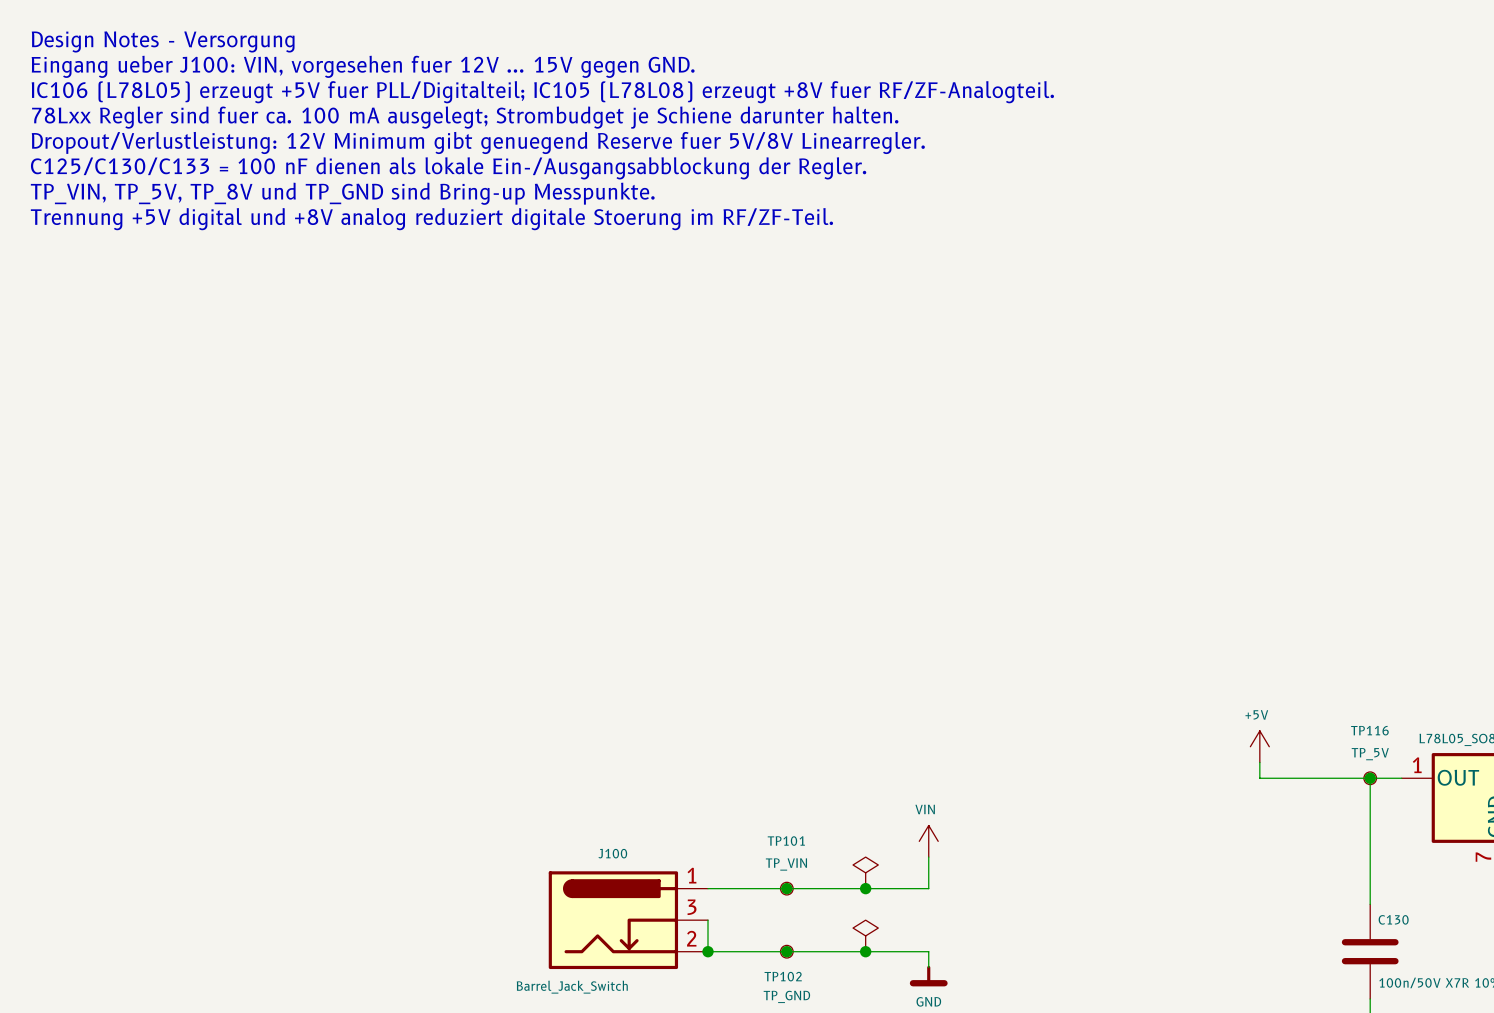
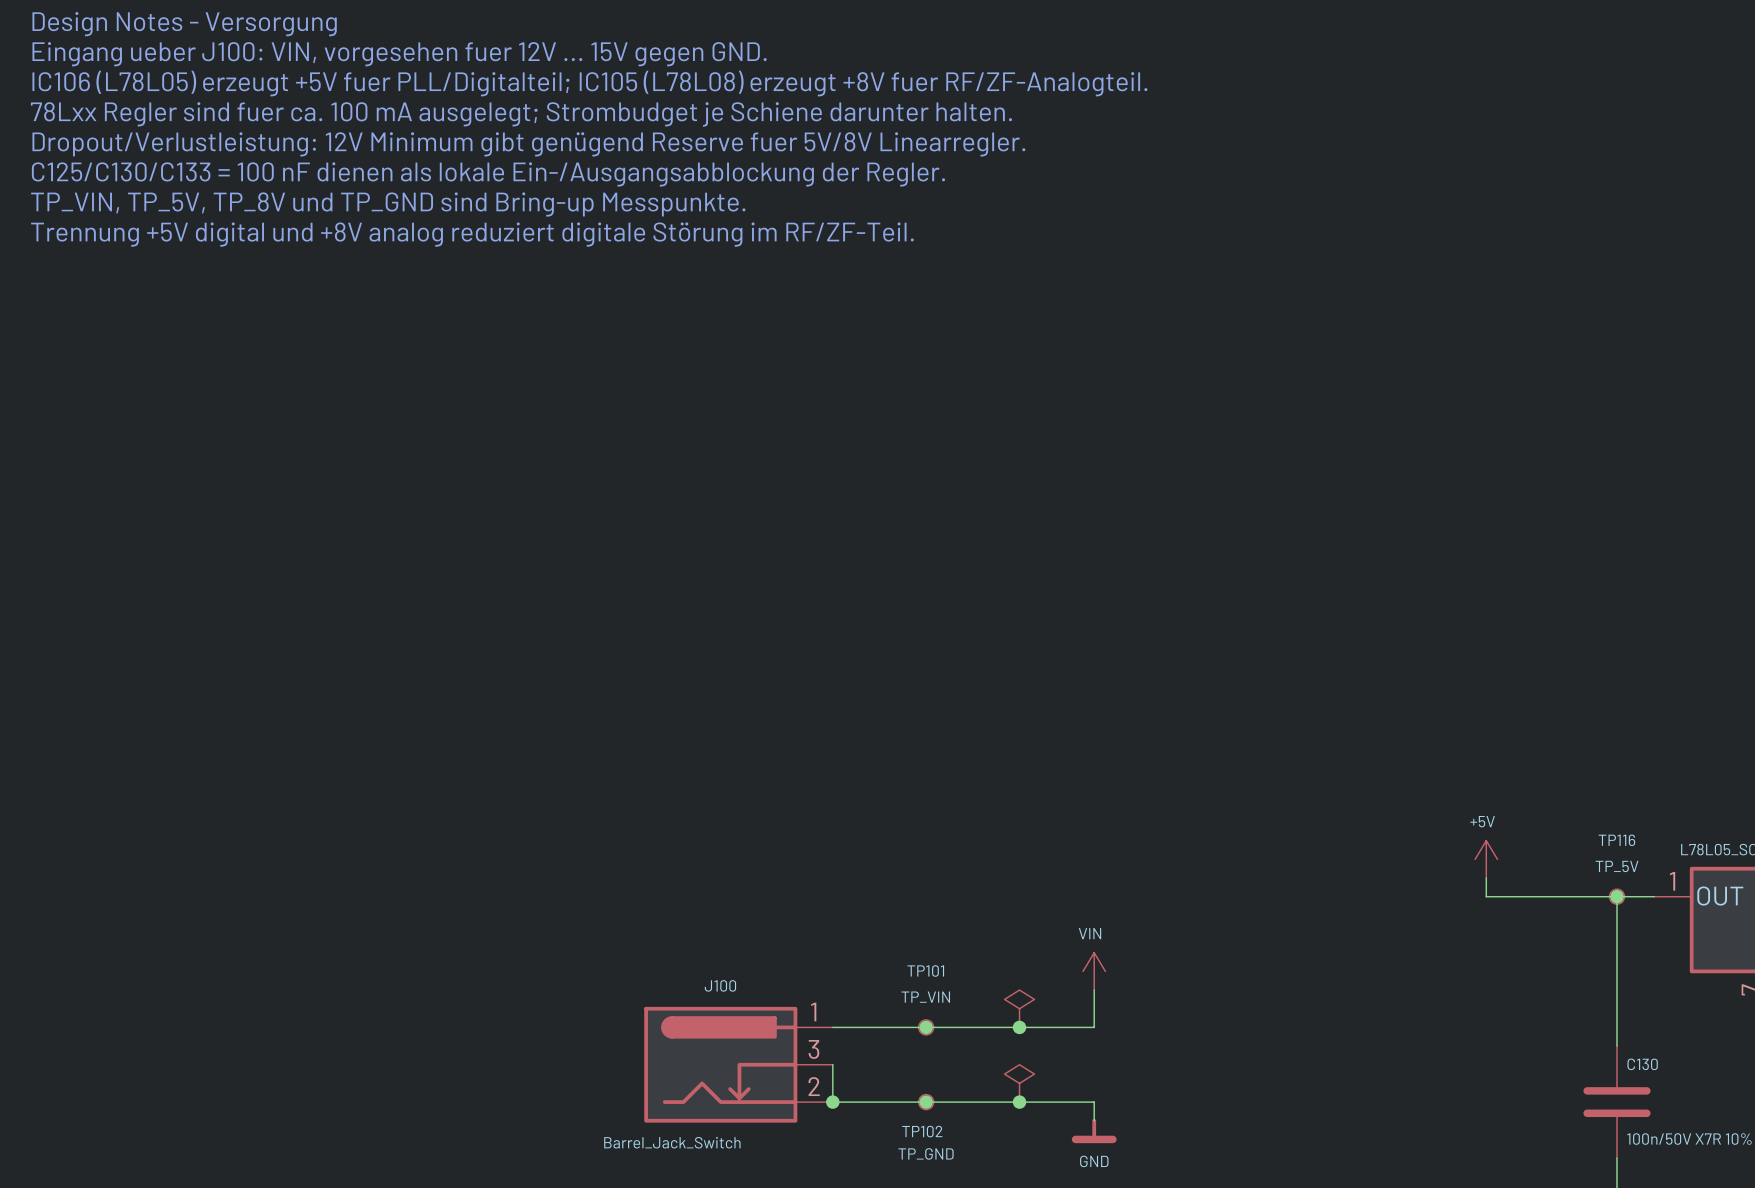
text: Dropout/Verlustleistung: 12V Minimum gibt genuegend Reserve fuer 5V/8V Linearregler. (478, 142) -> Dropout/Verlustleistung: 12V Minimum gibt genügend Reserve fuer 5V/8V Linearregler. (528, 144)
text: Trennung +5V digital und +8V analog reduziert digitale Stoerung im RF/ZF-Teil. (431, 219) -> Trennung +5V digital und +8V analog reduziert digitale Störung im RF/ZF-Teil. (472, 234)

